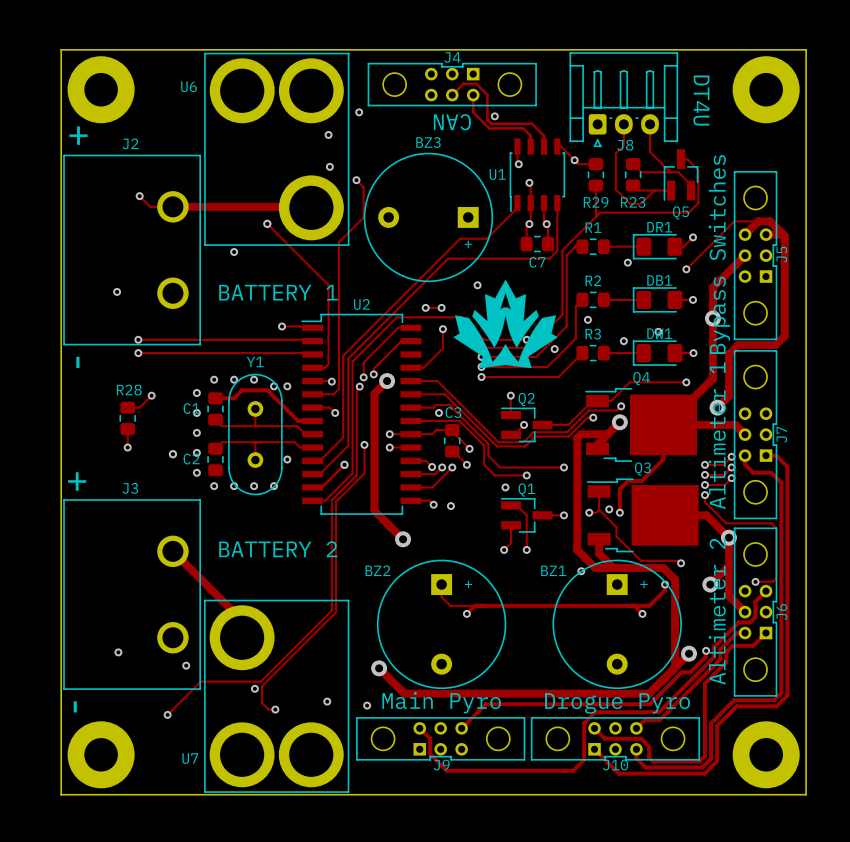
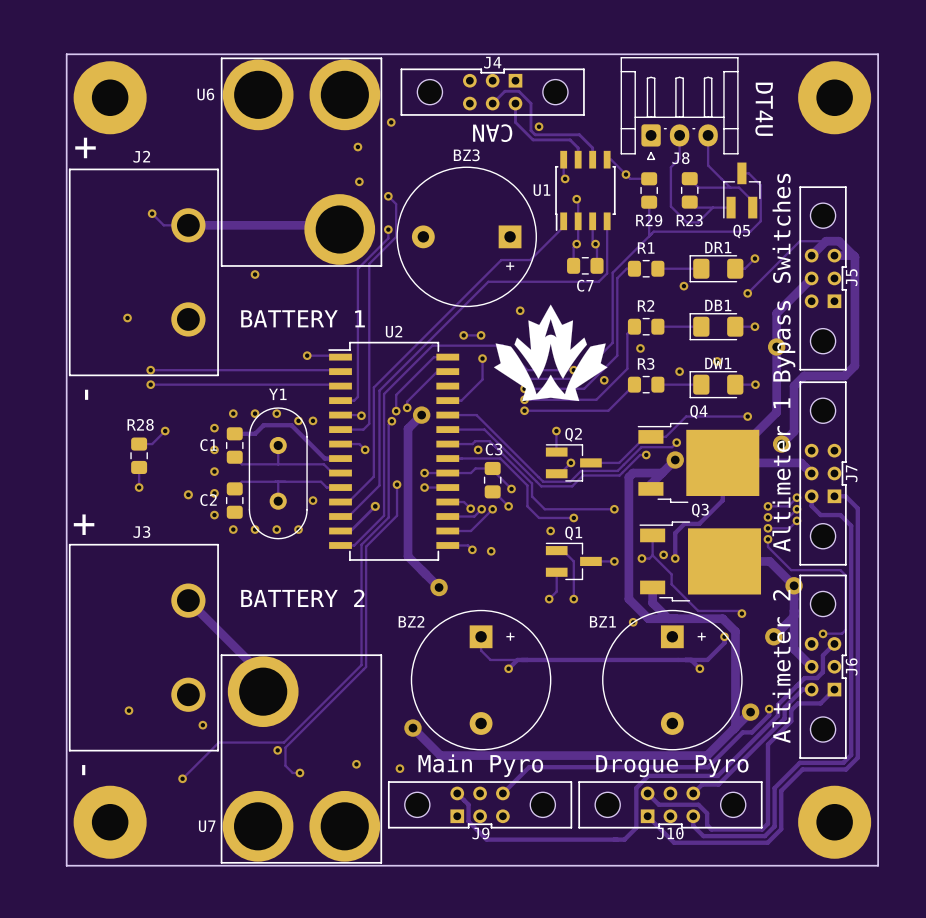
U6 footprint: [204, 52, 350, 246] -> [220, 57, 383, 267]
via: none -> (388, 229)
track: (267, 223) (328, 285) -> (388, 229) (388, 238) (357, 268) (357, 310)
via: (267, 223) -> none
U7 footprint: [204, 599, 350, 793] -> [220, 654, 383, 864]

